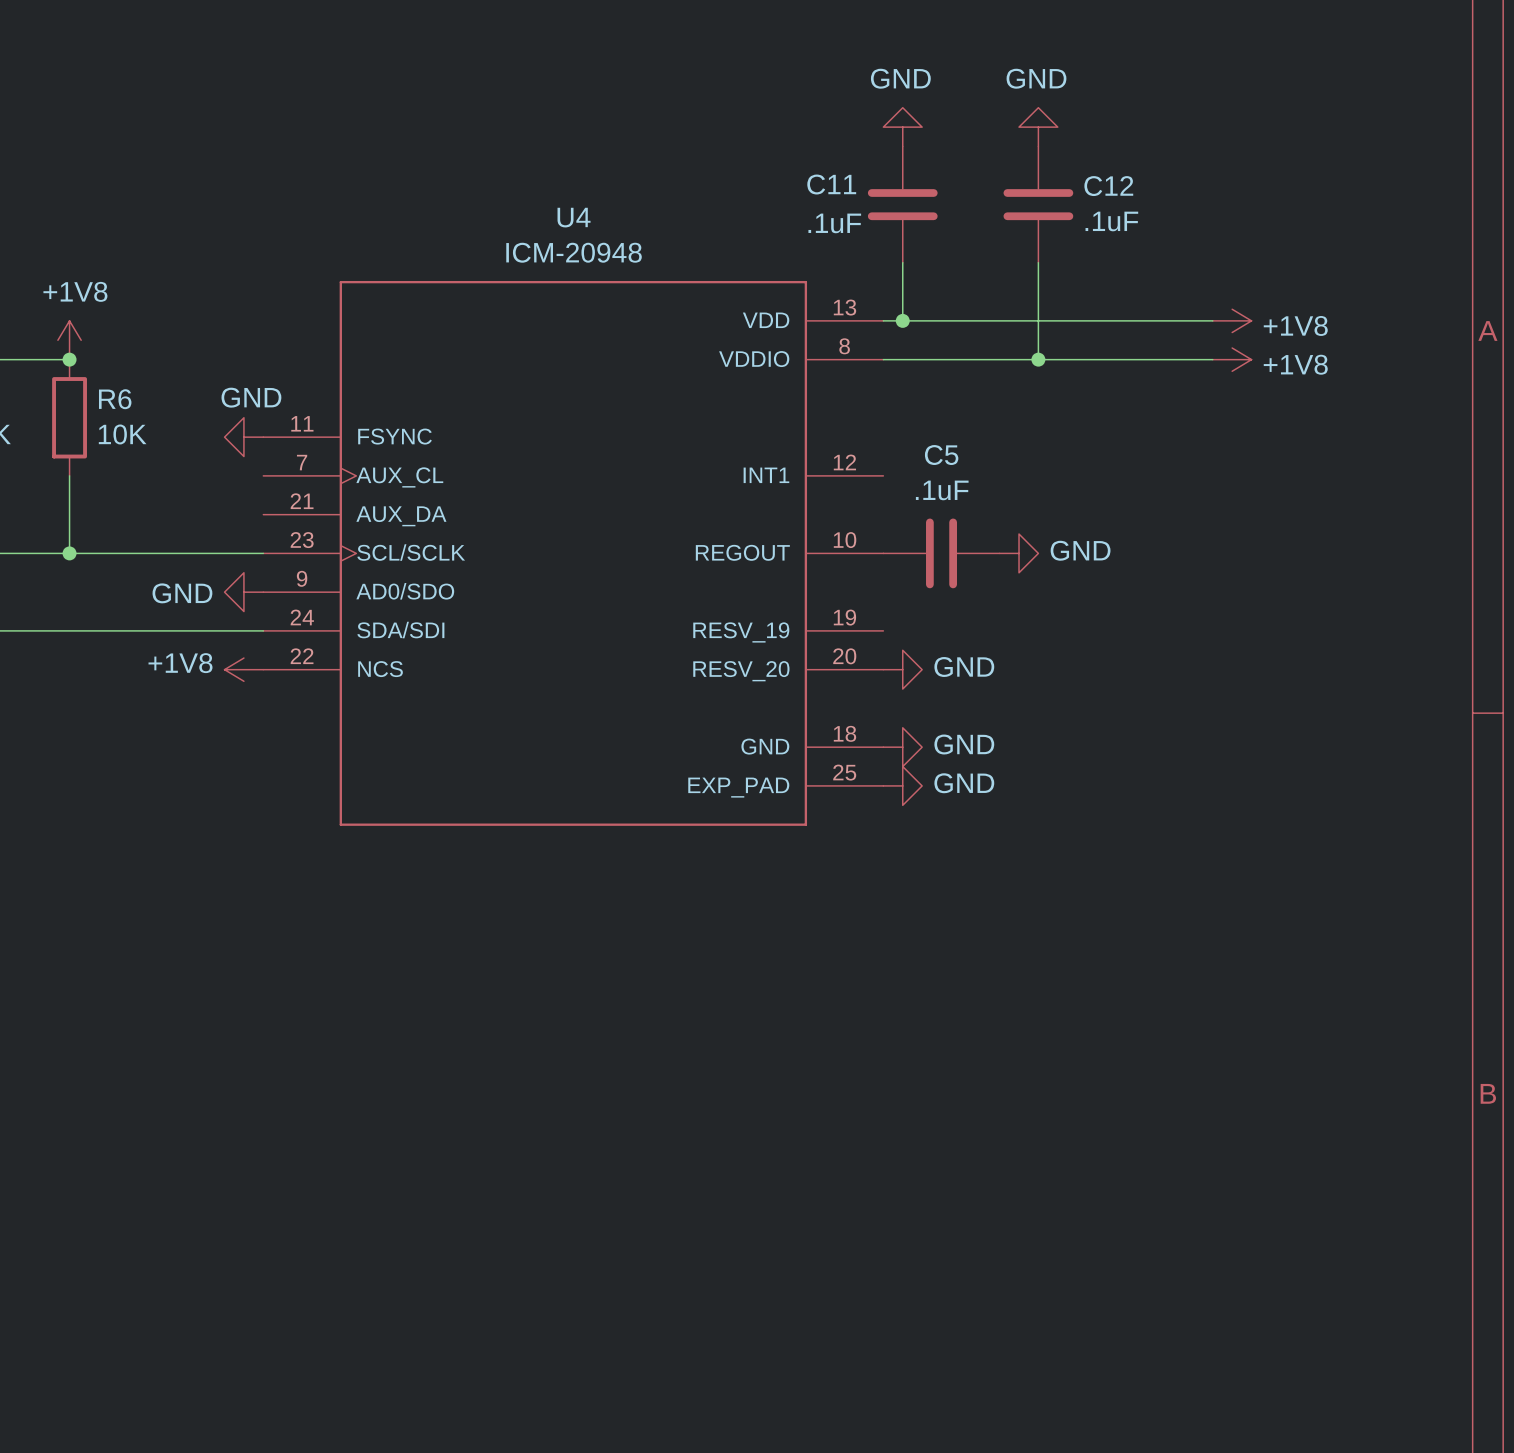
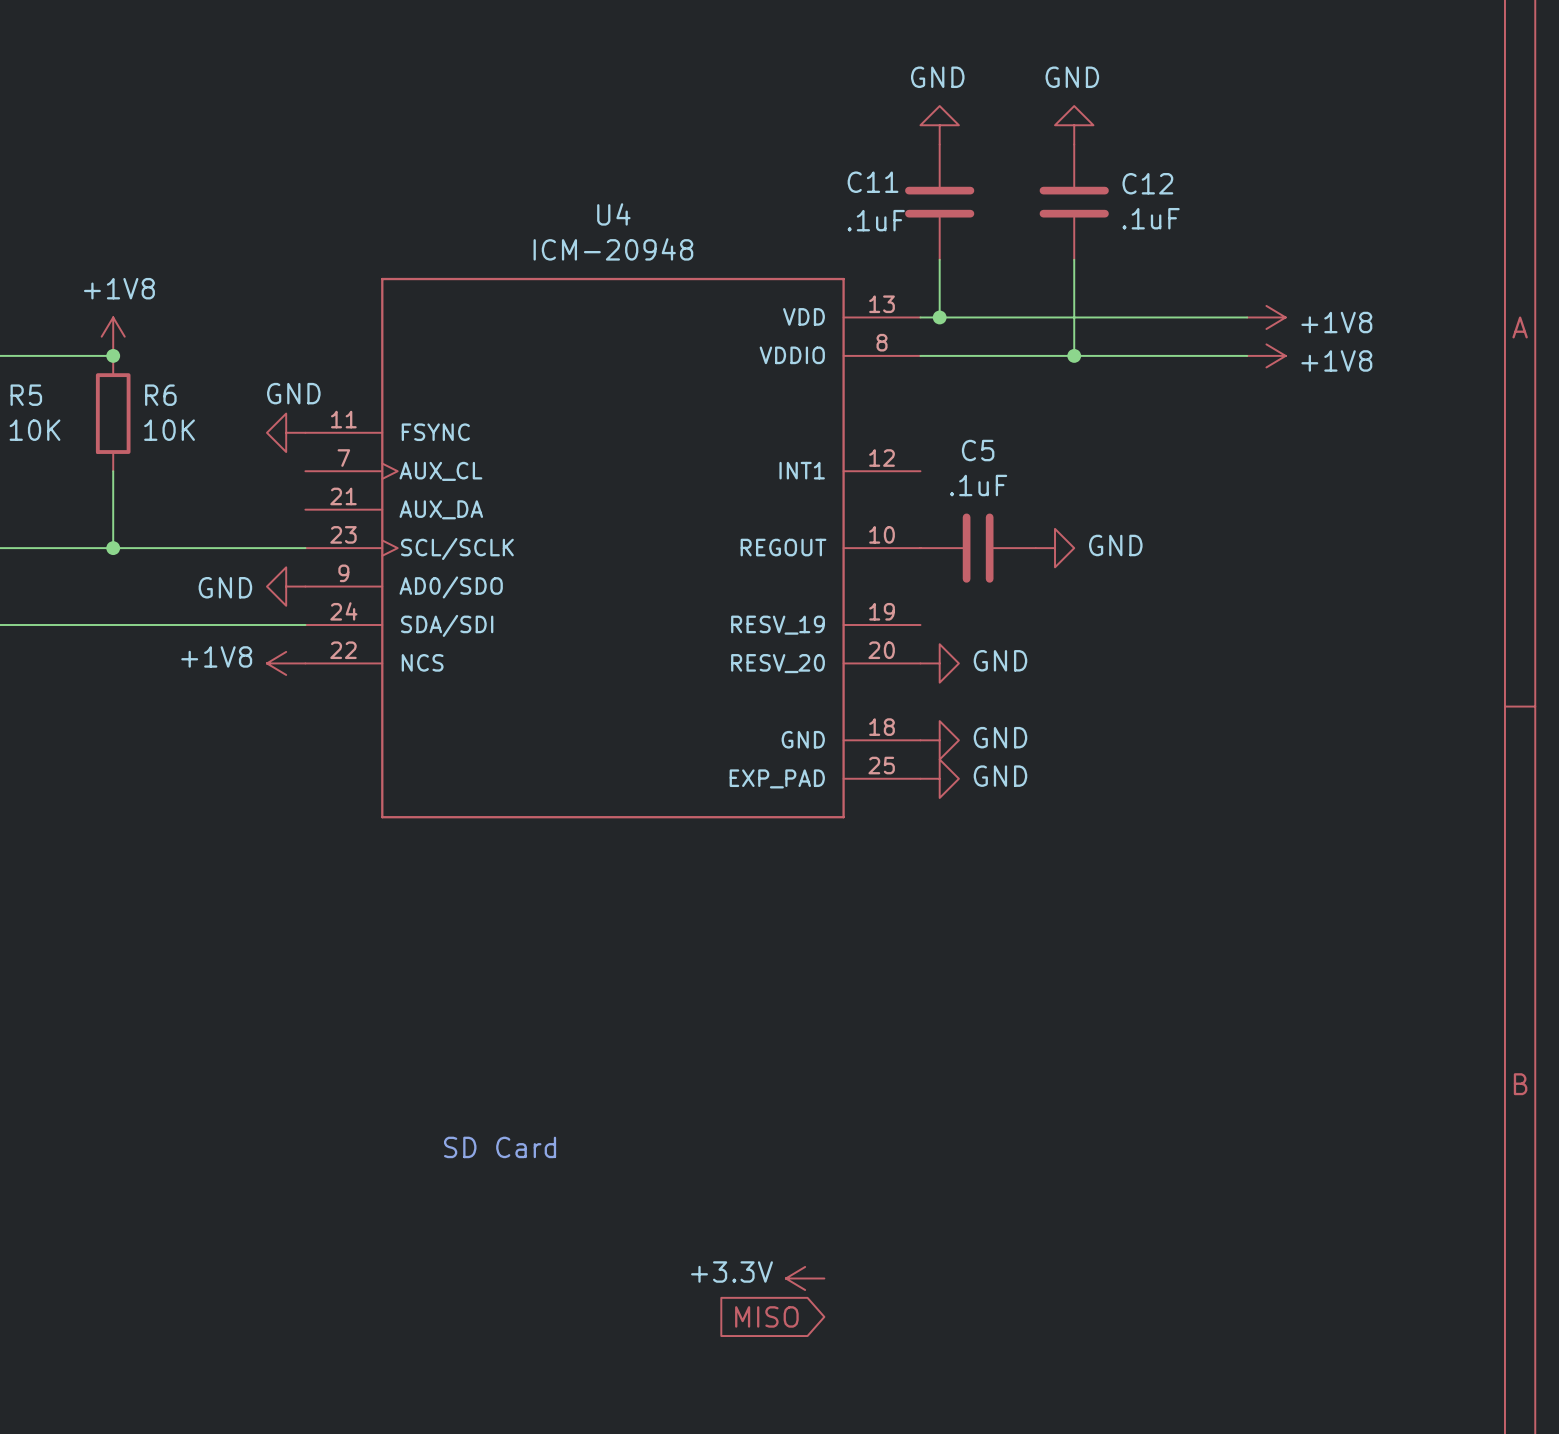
text: none -> SD Card (500, 1147)
power symbol: none -> +3.3V (805, 1278)
global label: none -> MISO (766, 1316)

